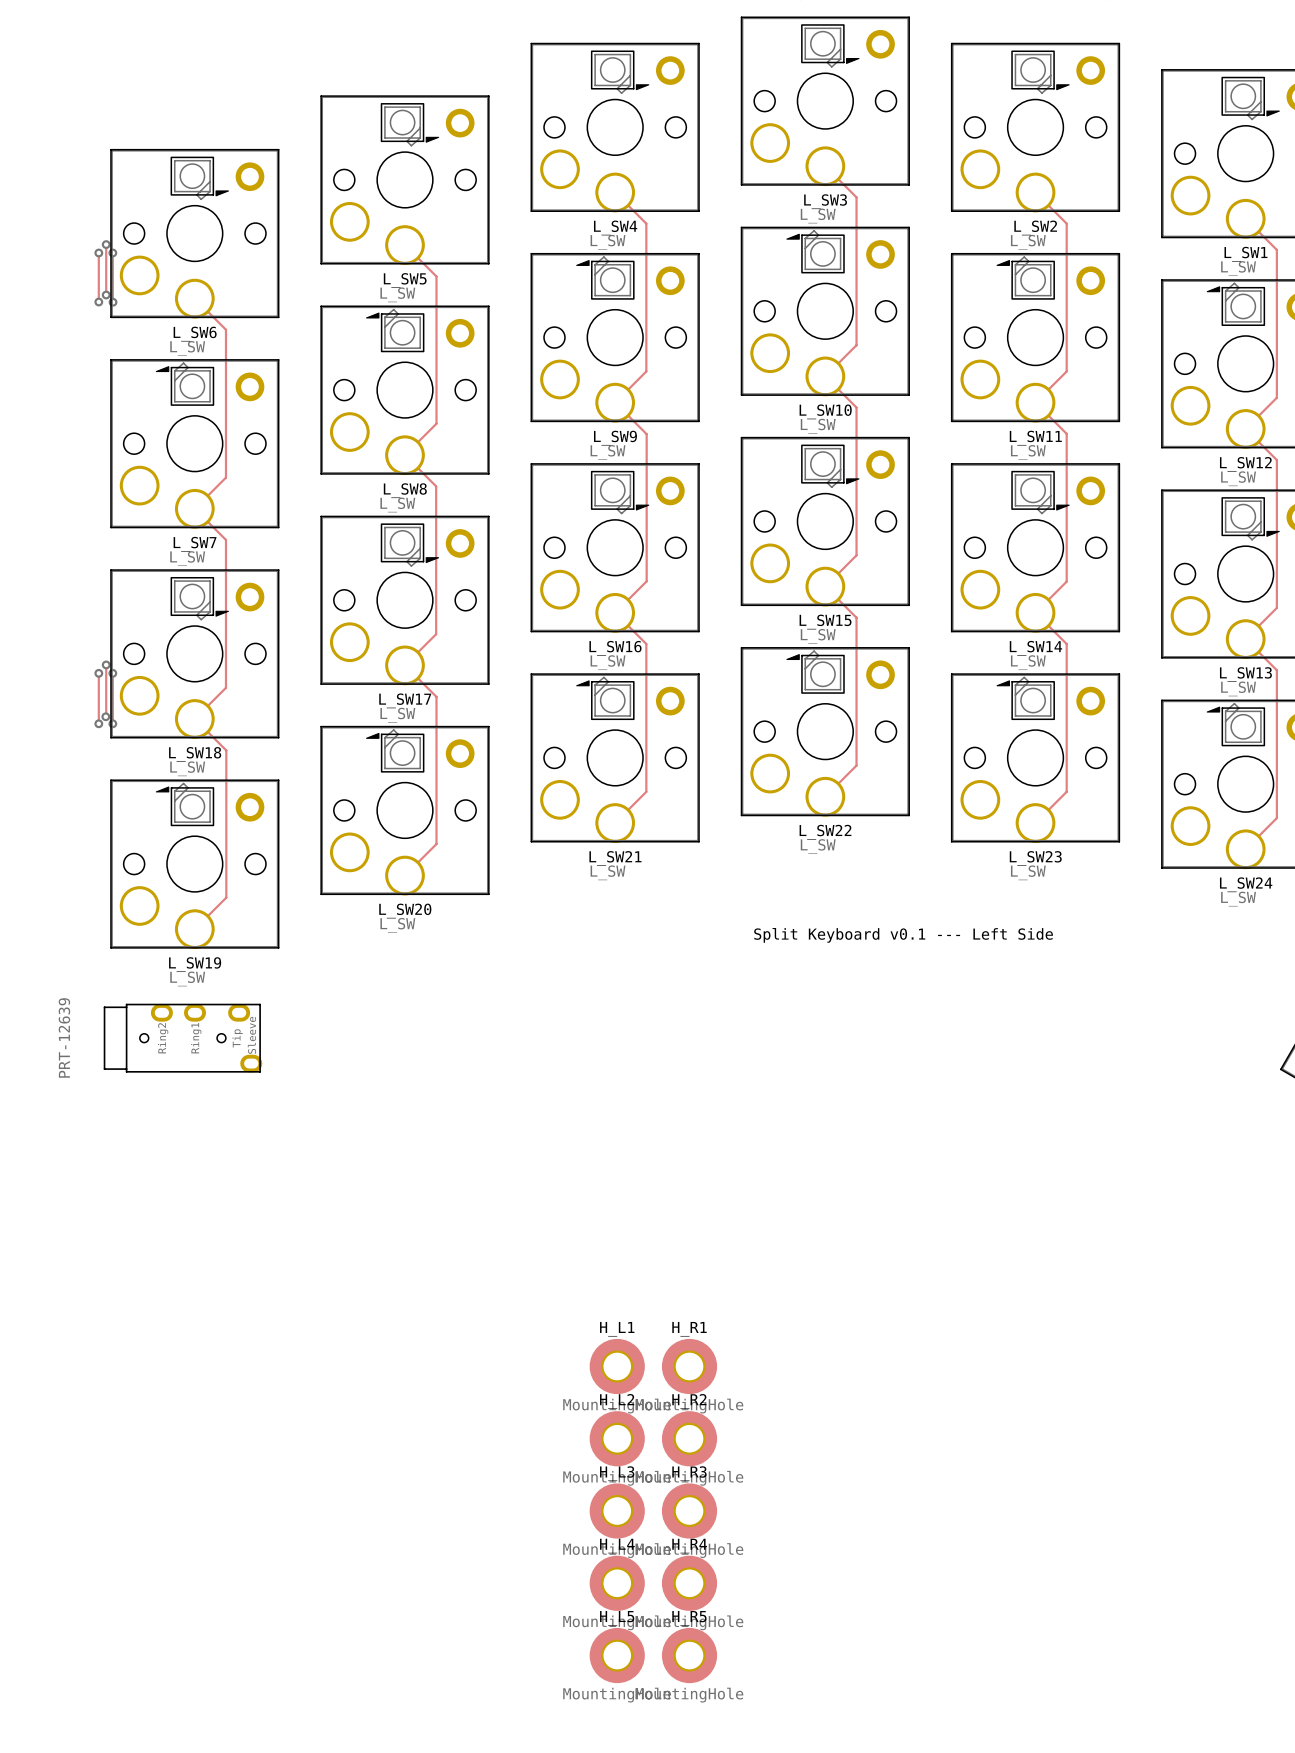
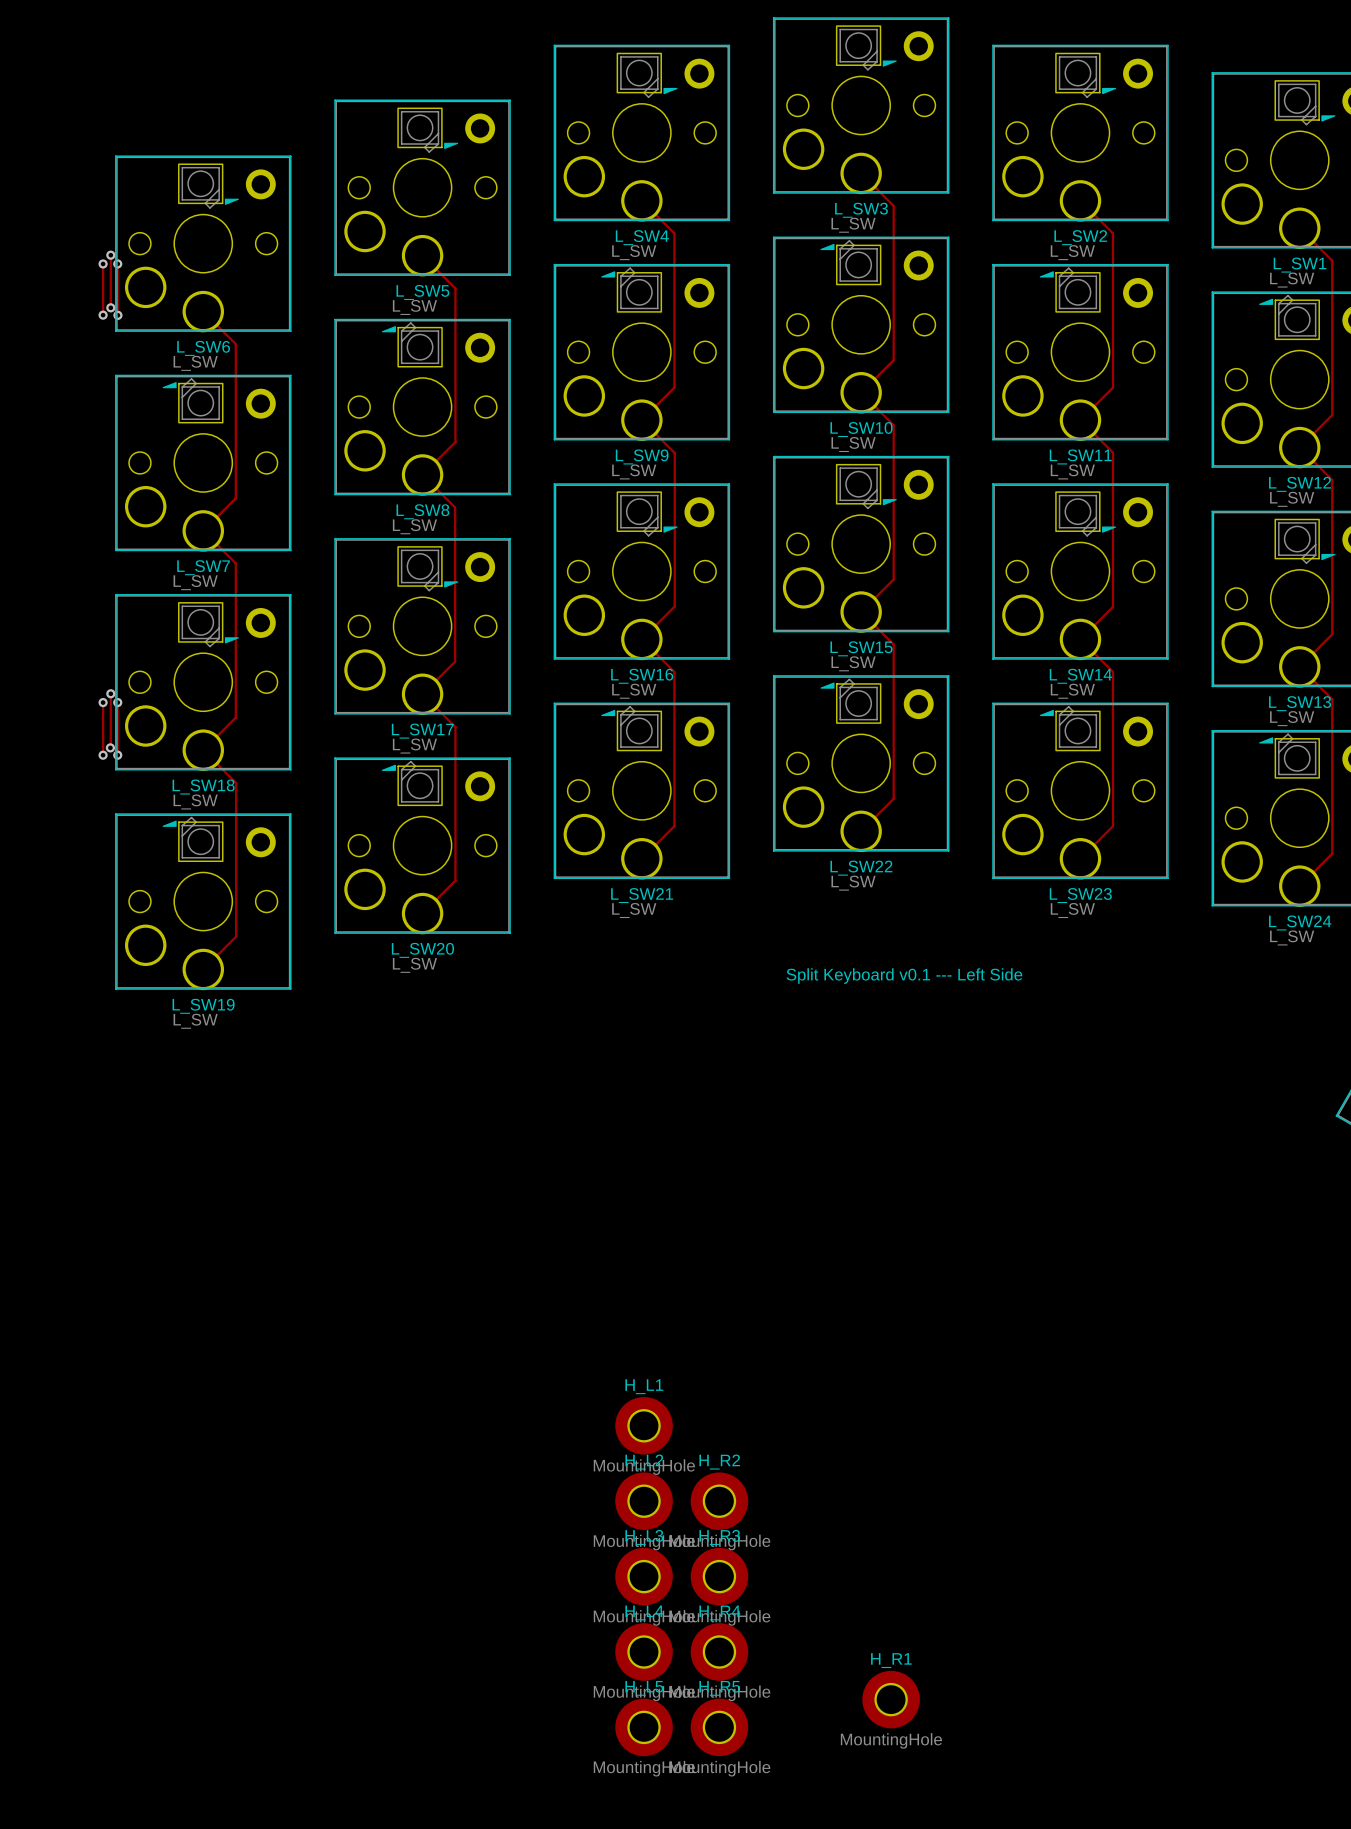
part: PRT-12639 (183, 1038) -> none
H_R1 position: (689, 1366) -> (891, 1699)

